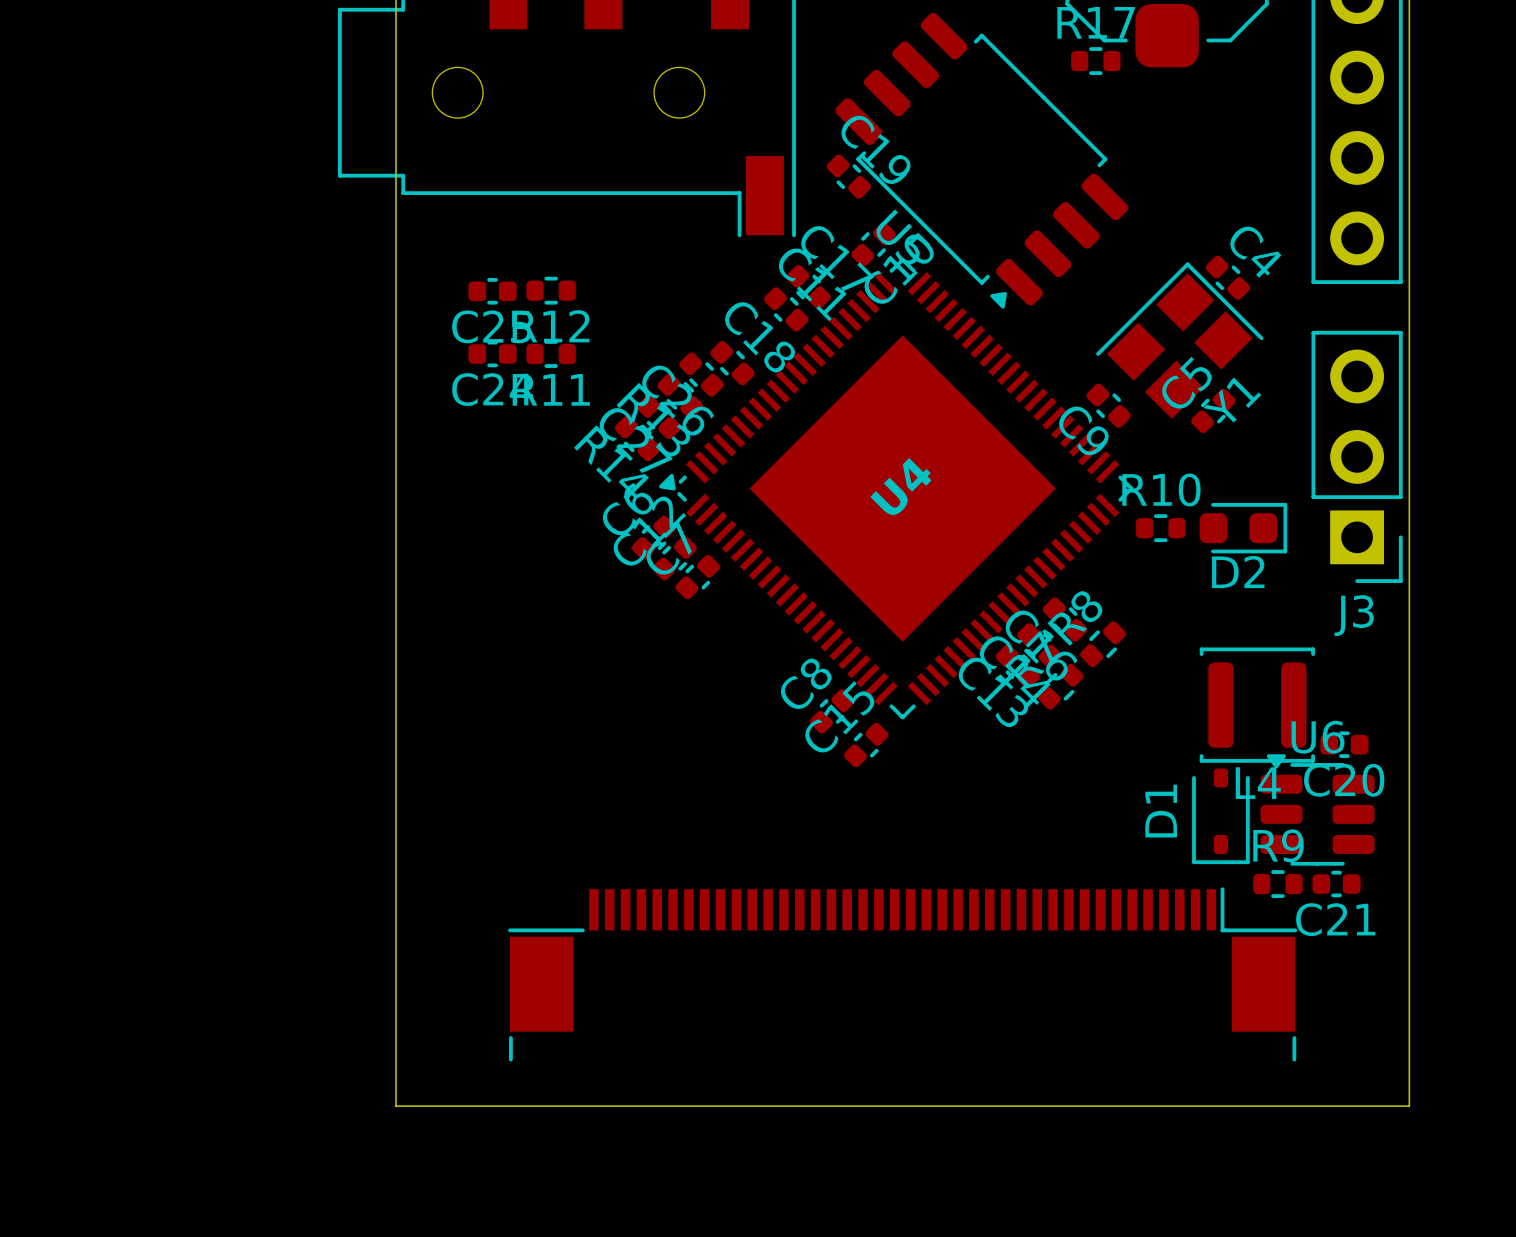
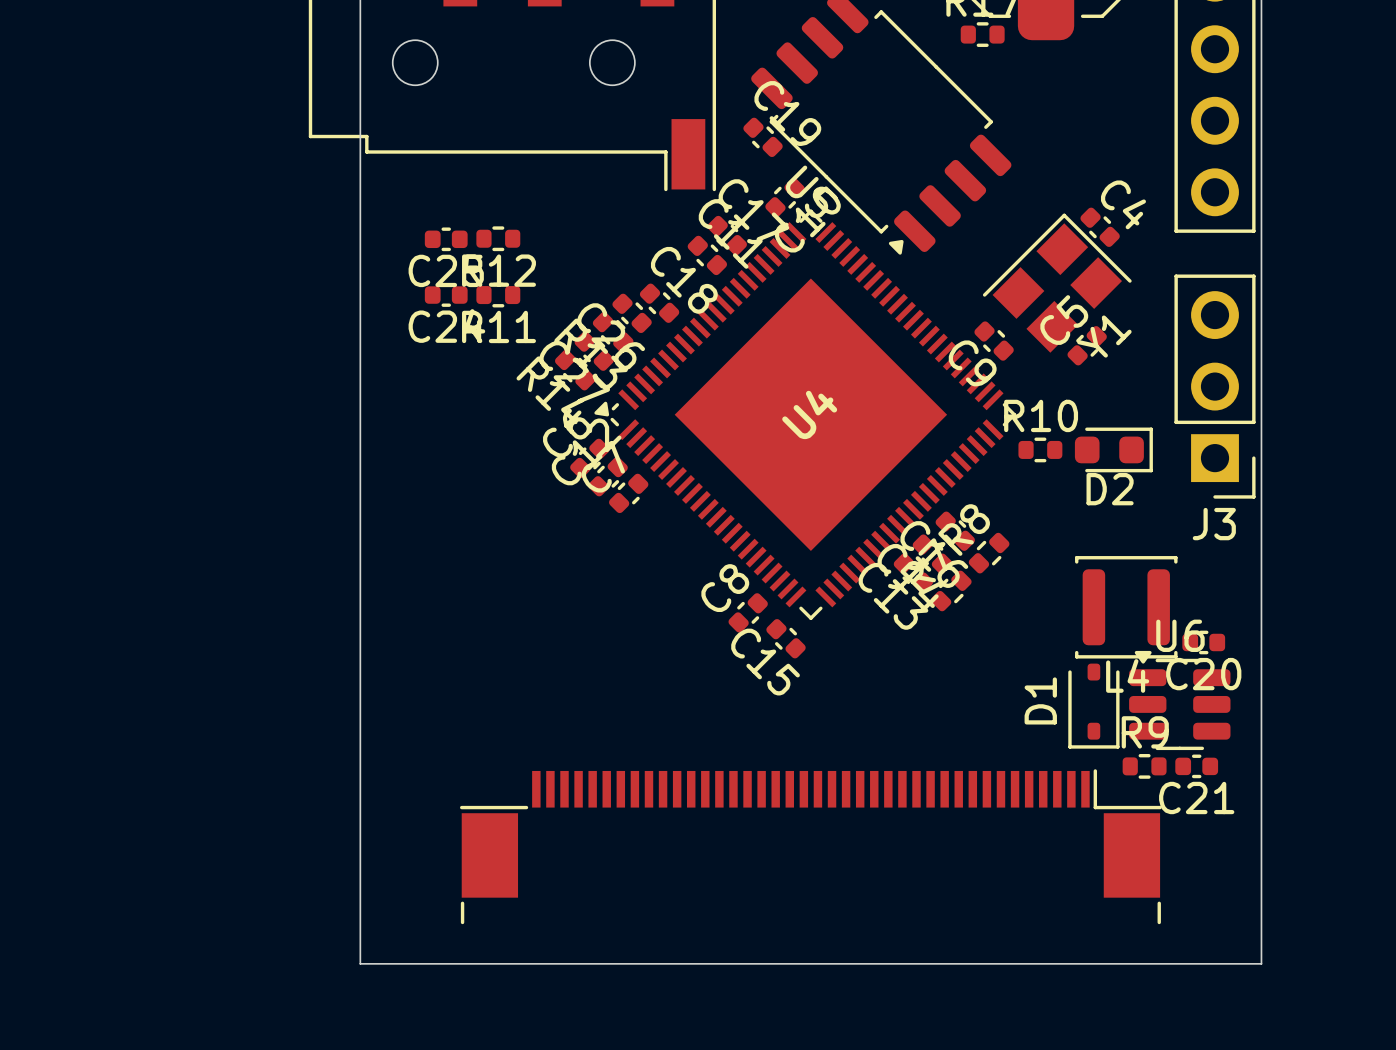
C15 rotation: 0° (866, 745) -> 90° clockwise (786, 638)

